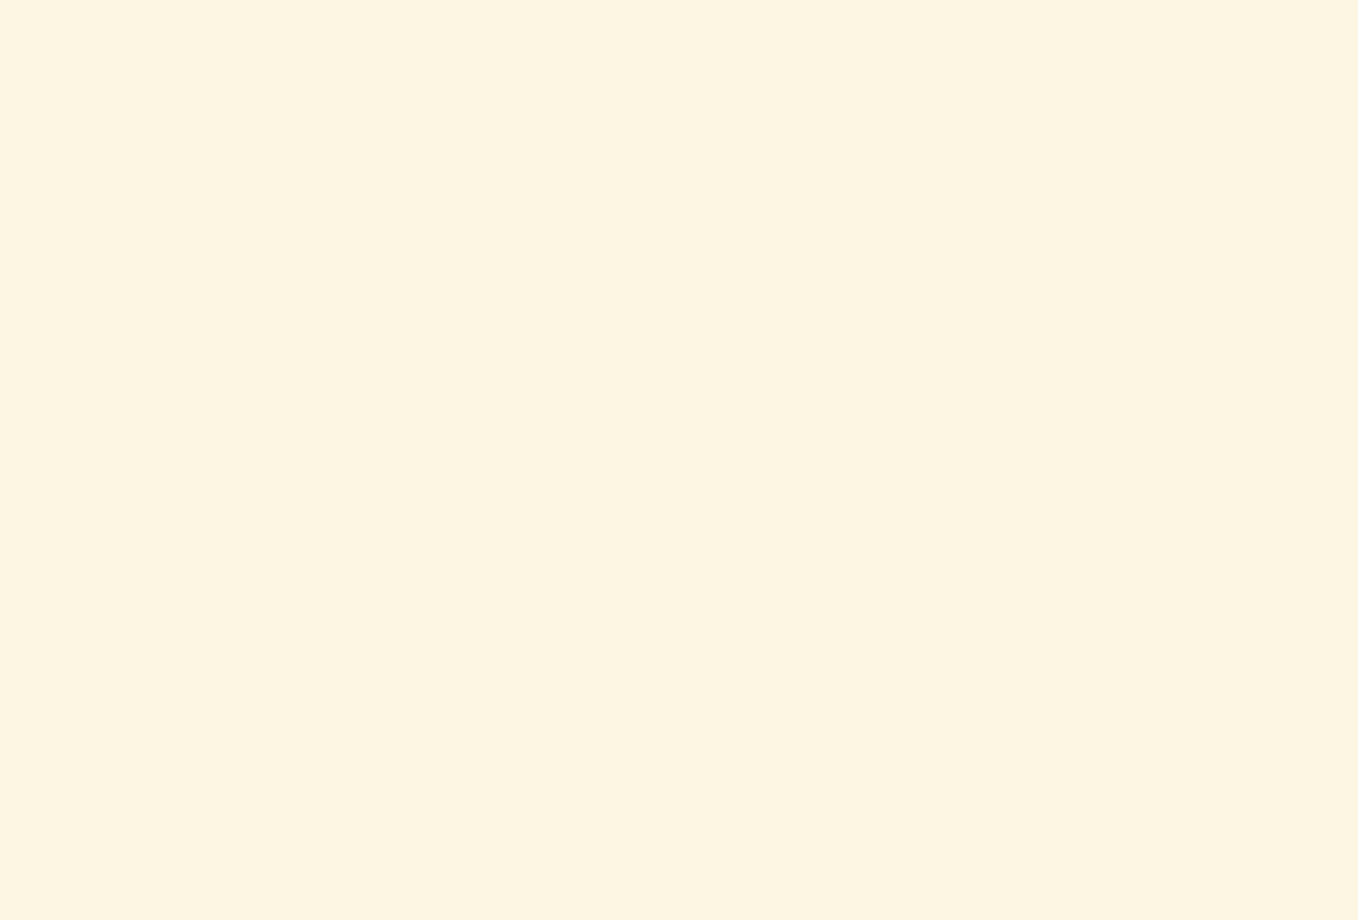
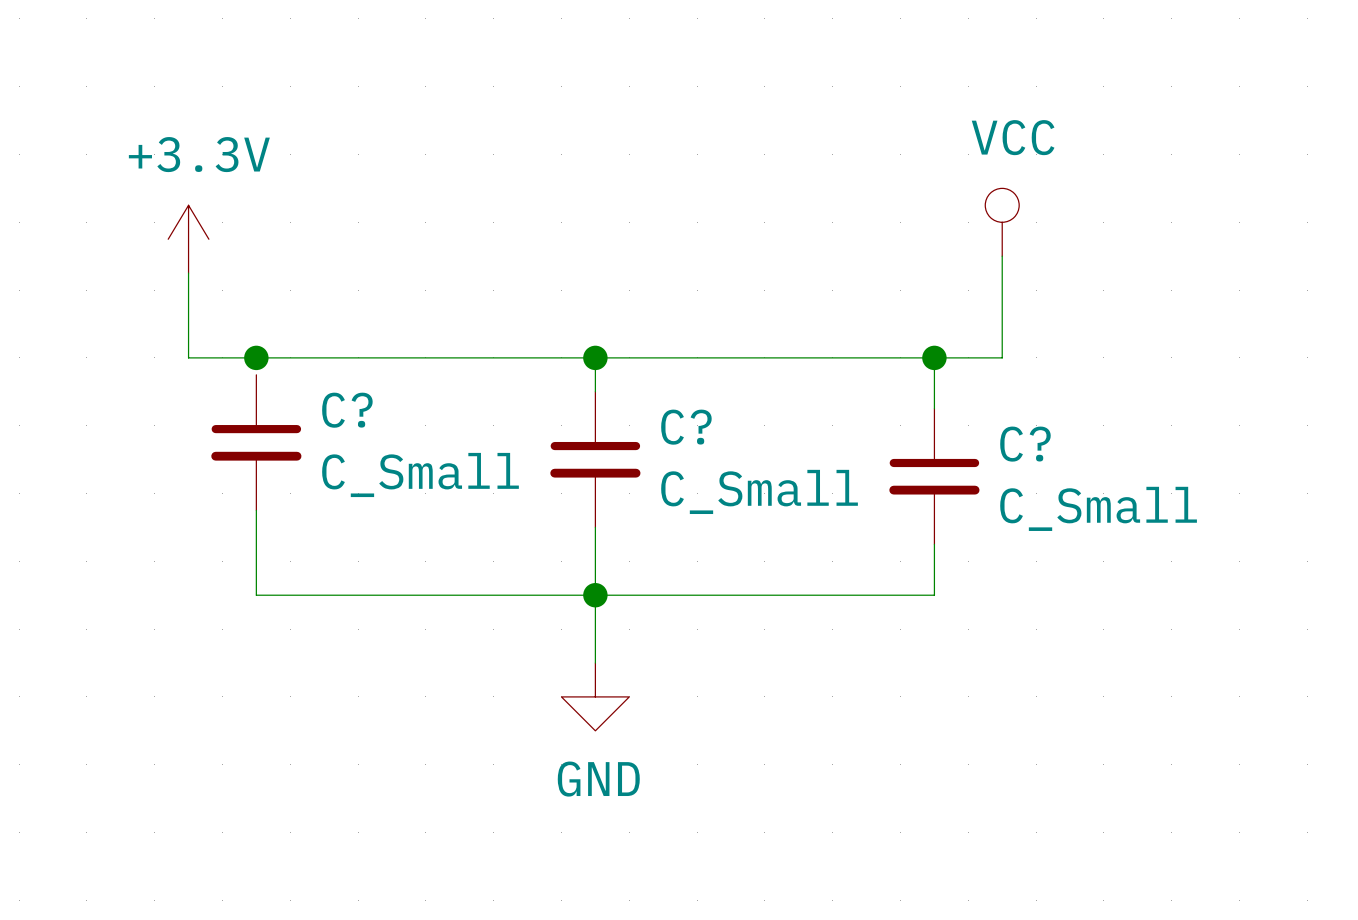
power symbol: none -> VCC (1002, 222)
power symbol: none -> +3.3V (188, 239)
wire: none -> (1002, 256) (1002, 357) (188, 357) (188, 273)
junction: none -> (256, 357)
wire: none -> (595, 357) (595, 391)
junction: none -> (595, 357)
wire: none -> (934, 357) (934, 408)
junction: none -> (934, 357)
C?: none -> C_Small (256, 442)
C?: none -> C_Small (595, 459)
C?: none -> C_Small (934, 476)
wire: none -> (256, 510) (256, 595) (934, 595) (934, 544)
wire: none -> (595, 527) (595, 663)
junction: none -> (595, 595)
power symbol: none -> GND (595, 696)

